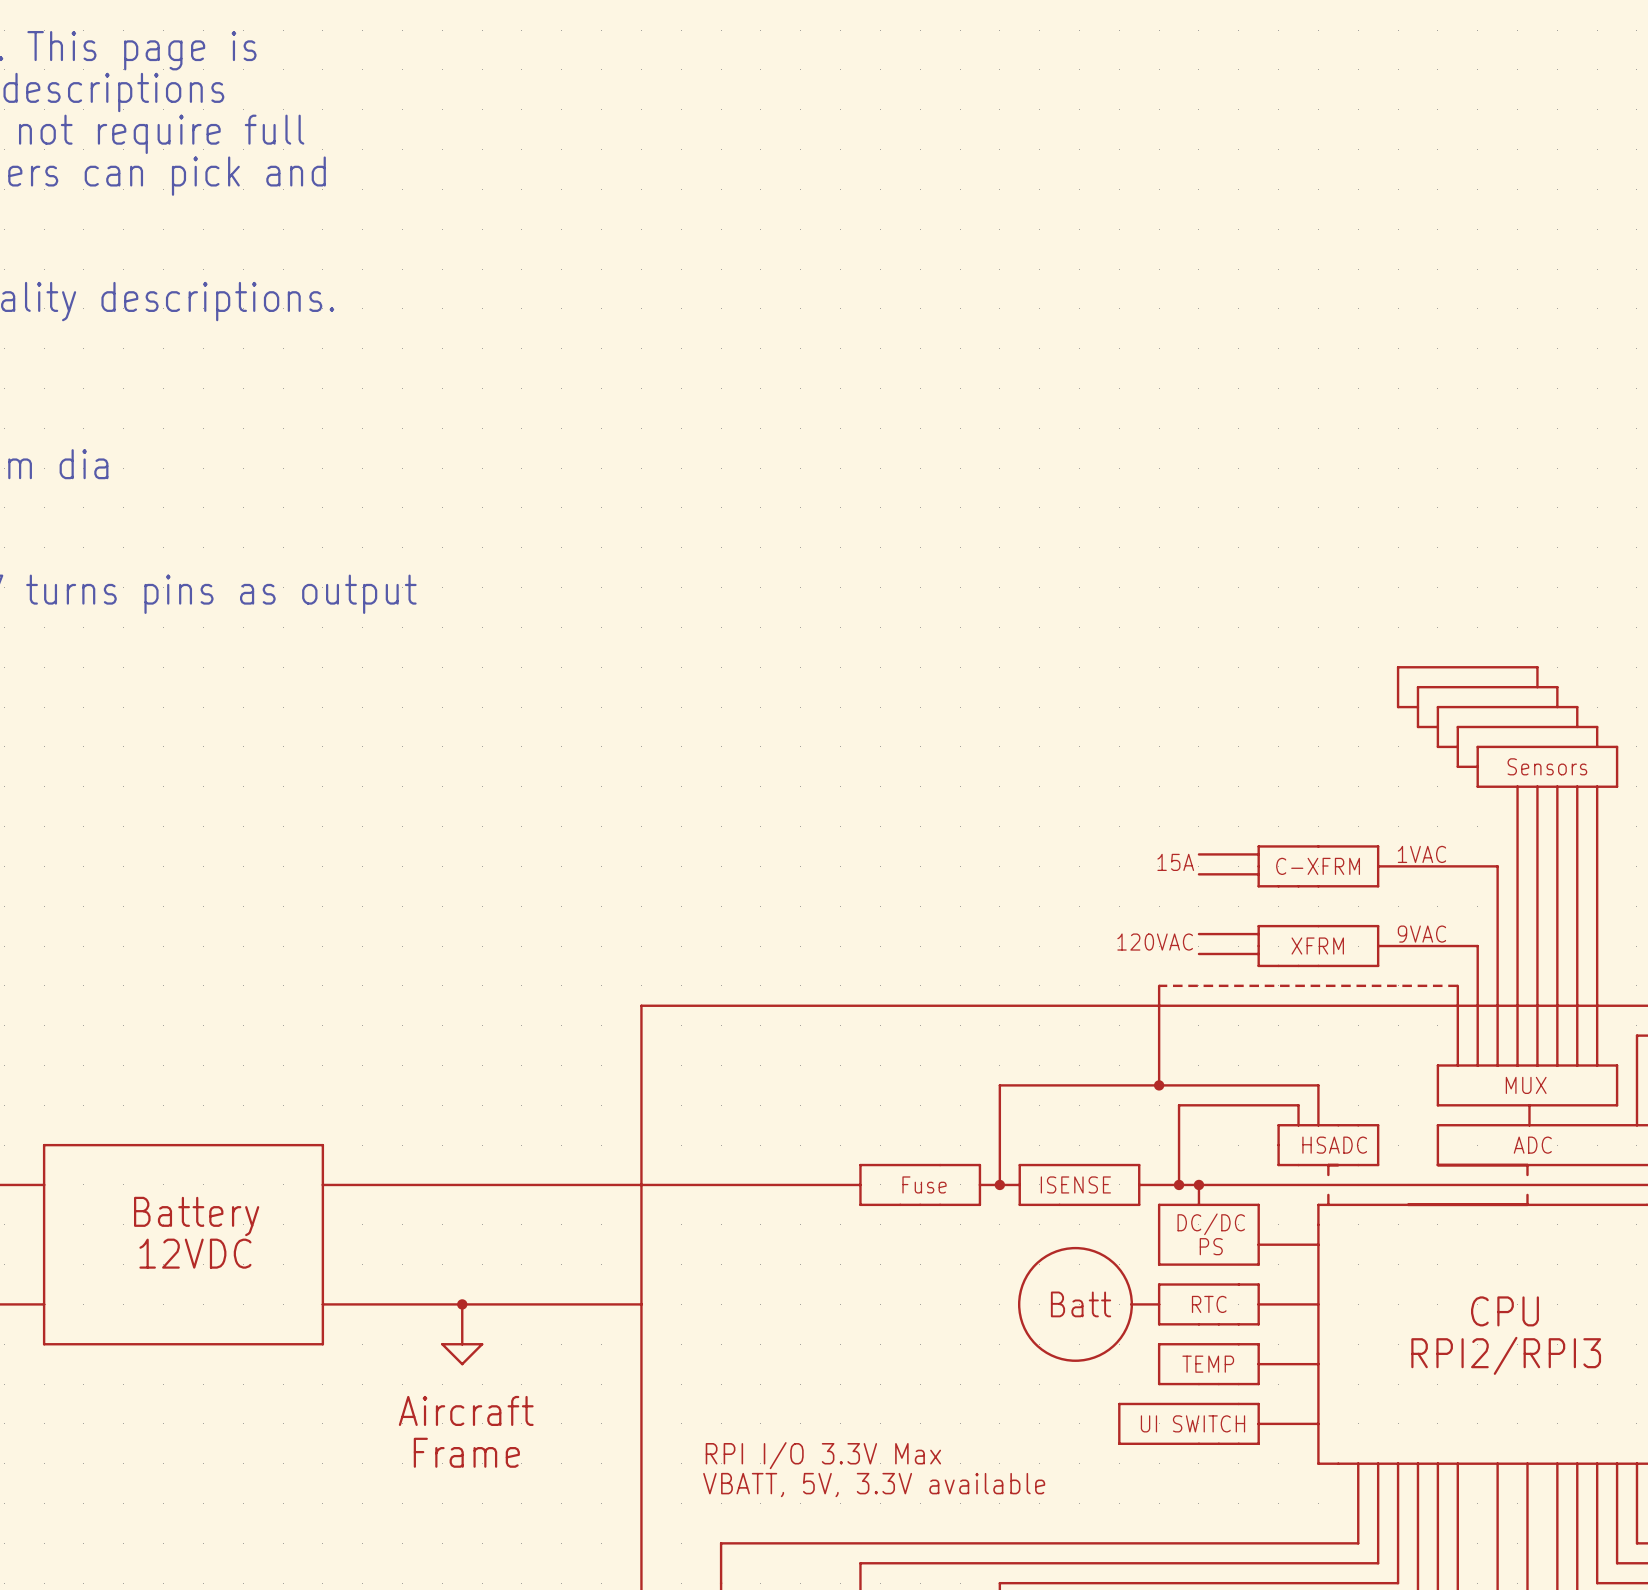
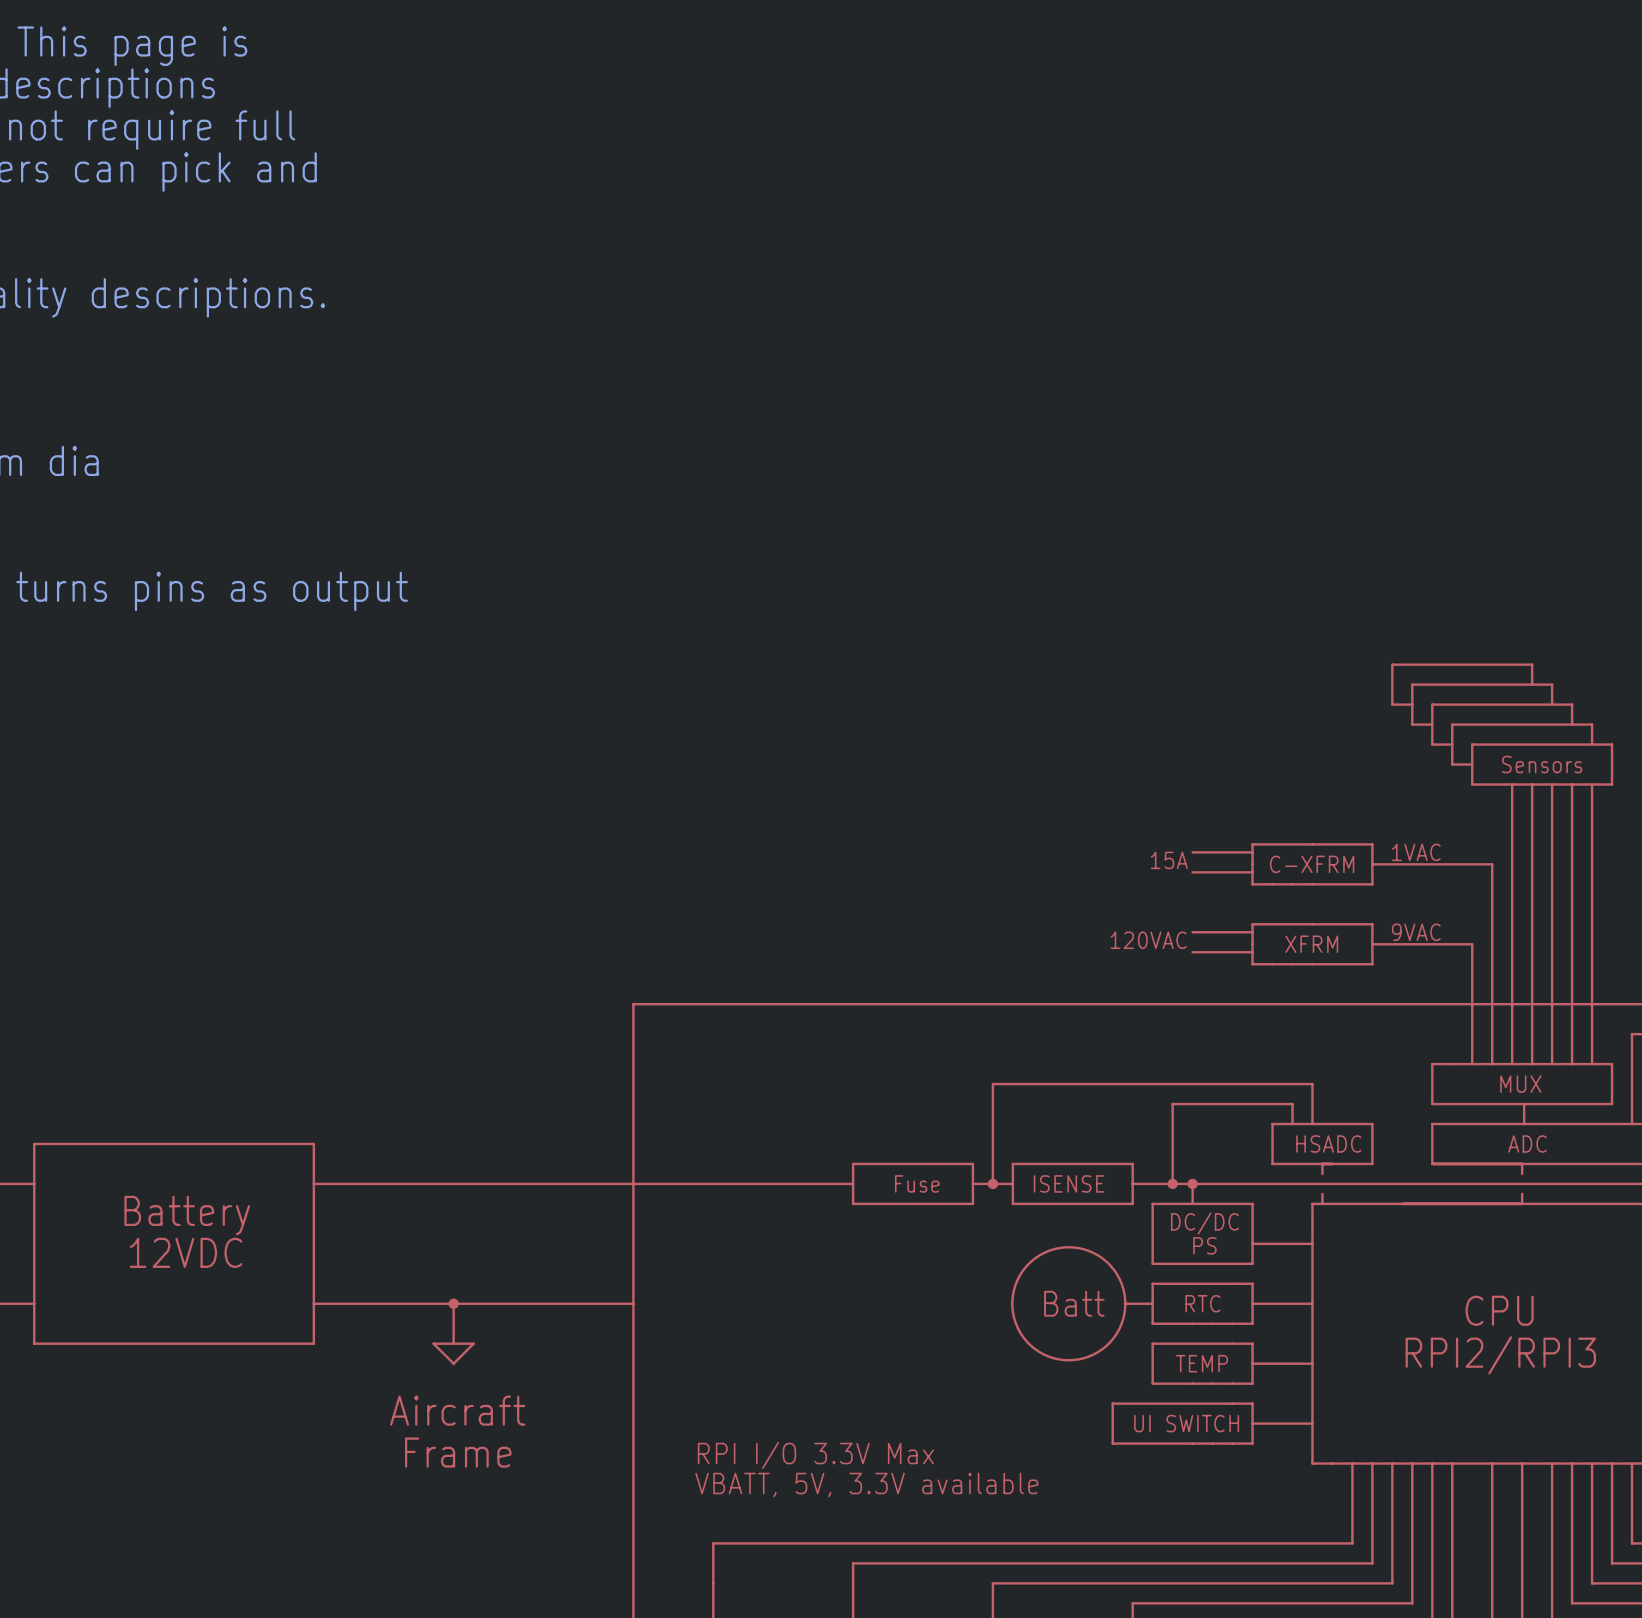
line: (1457, 1065) (1457, 985) (1159, 985) (1159, 1085) -> none
drawing: [1153, 1080, 1165, 1091] -> none

